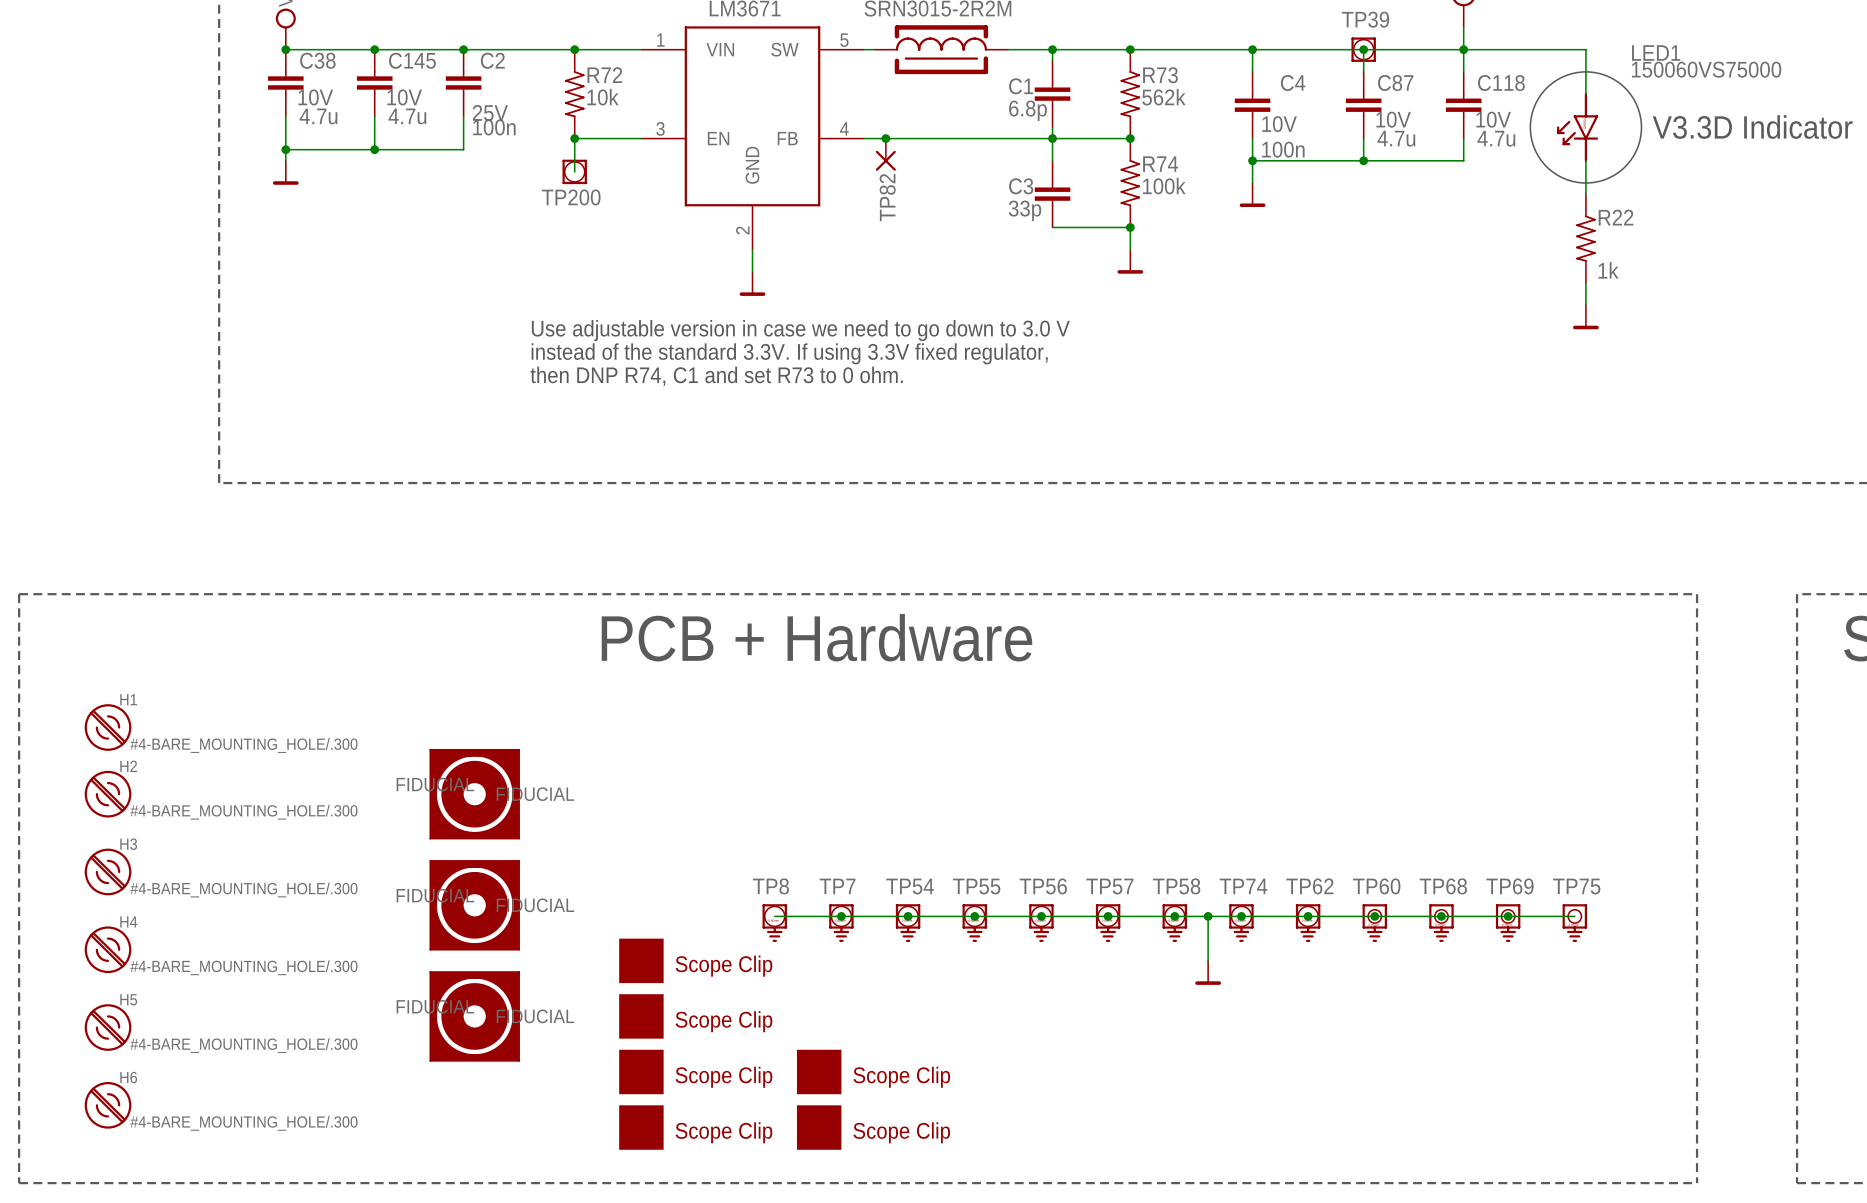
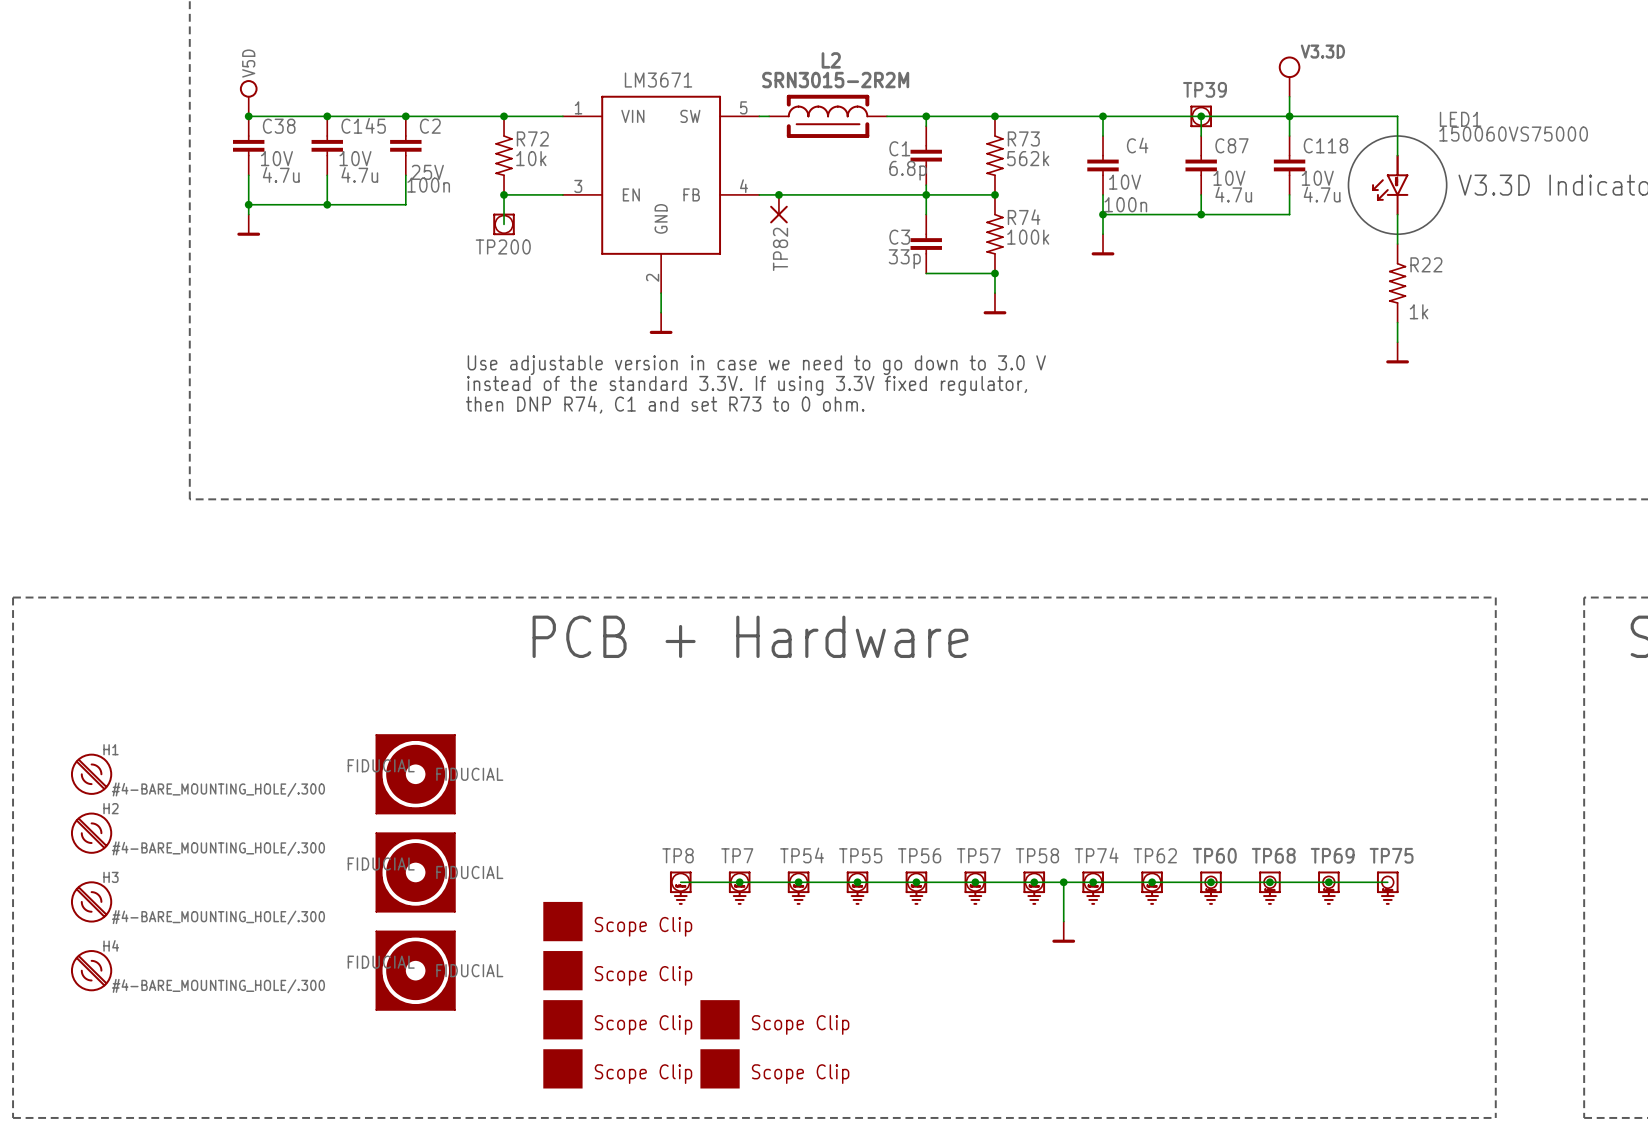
H1: #4-BARE_MOUNTING_HOLE/.300 (108, 727) -> none
H2 name: H2 (128, 766) -> H1 (110, 749)
H2: none -> #4-BARE_MOUNTING_HOLE/.300 (91, 833)
H3 position: (108, 871) -> (91, 901)
H4 position: (108, 949) -> (91, 970)
H5: #4-BARE_MOUNTING_HOLE/.300 (108, 1027) -> none
H6: #4-BARE_MOUNTING_HOLE/.300 (108, 1105) -> none

